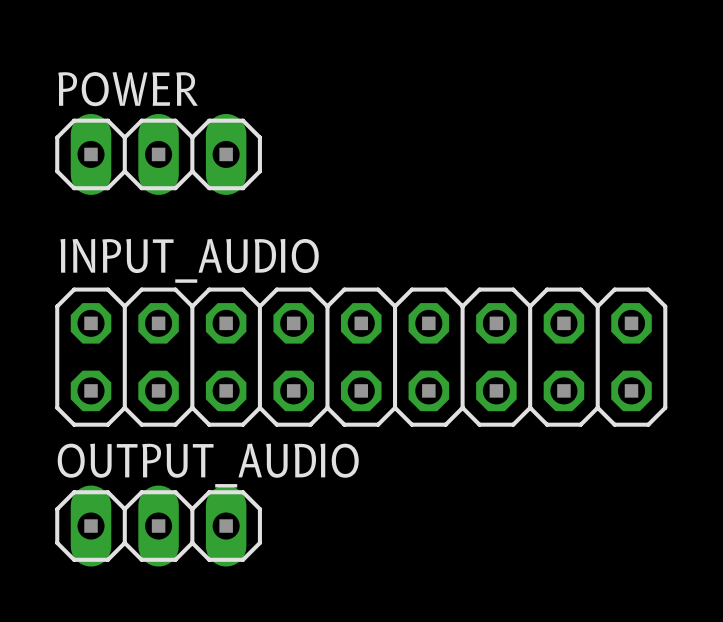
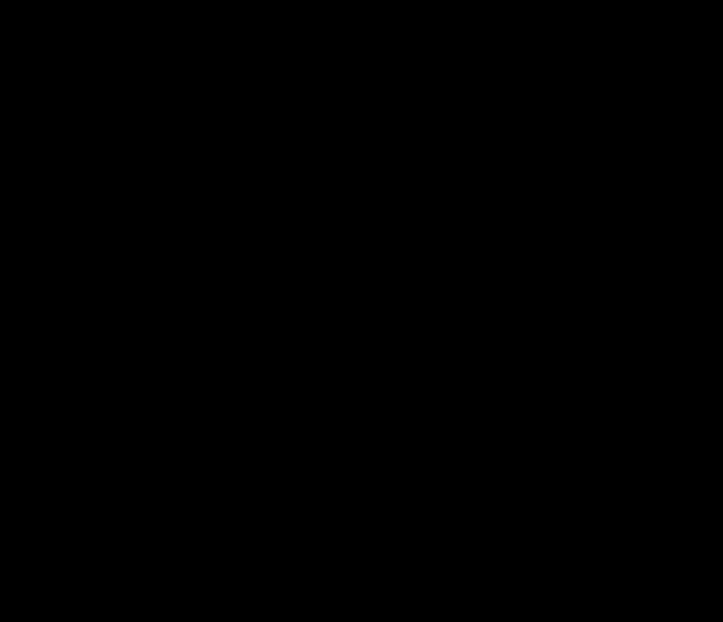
POWER: (158, 154) -> none
INPUT_AUDIO: (361, 357) -> none
OUTPUT_AUDIO: (158, 526) -> none

